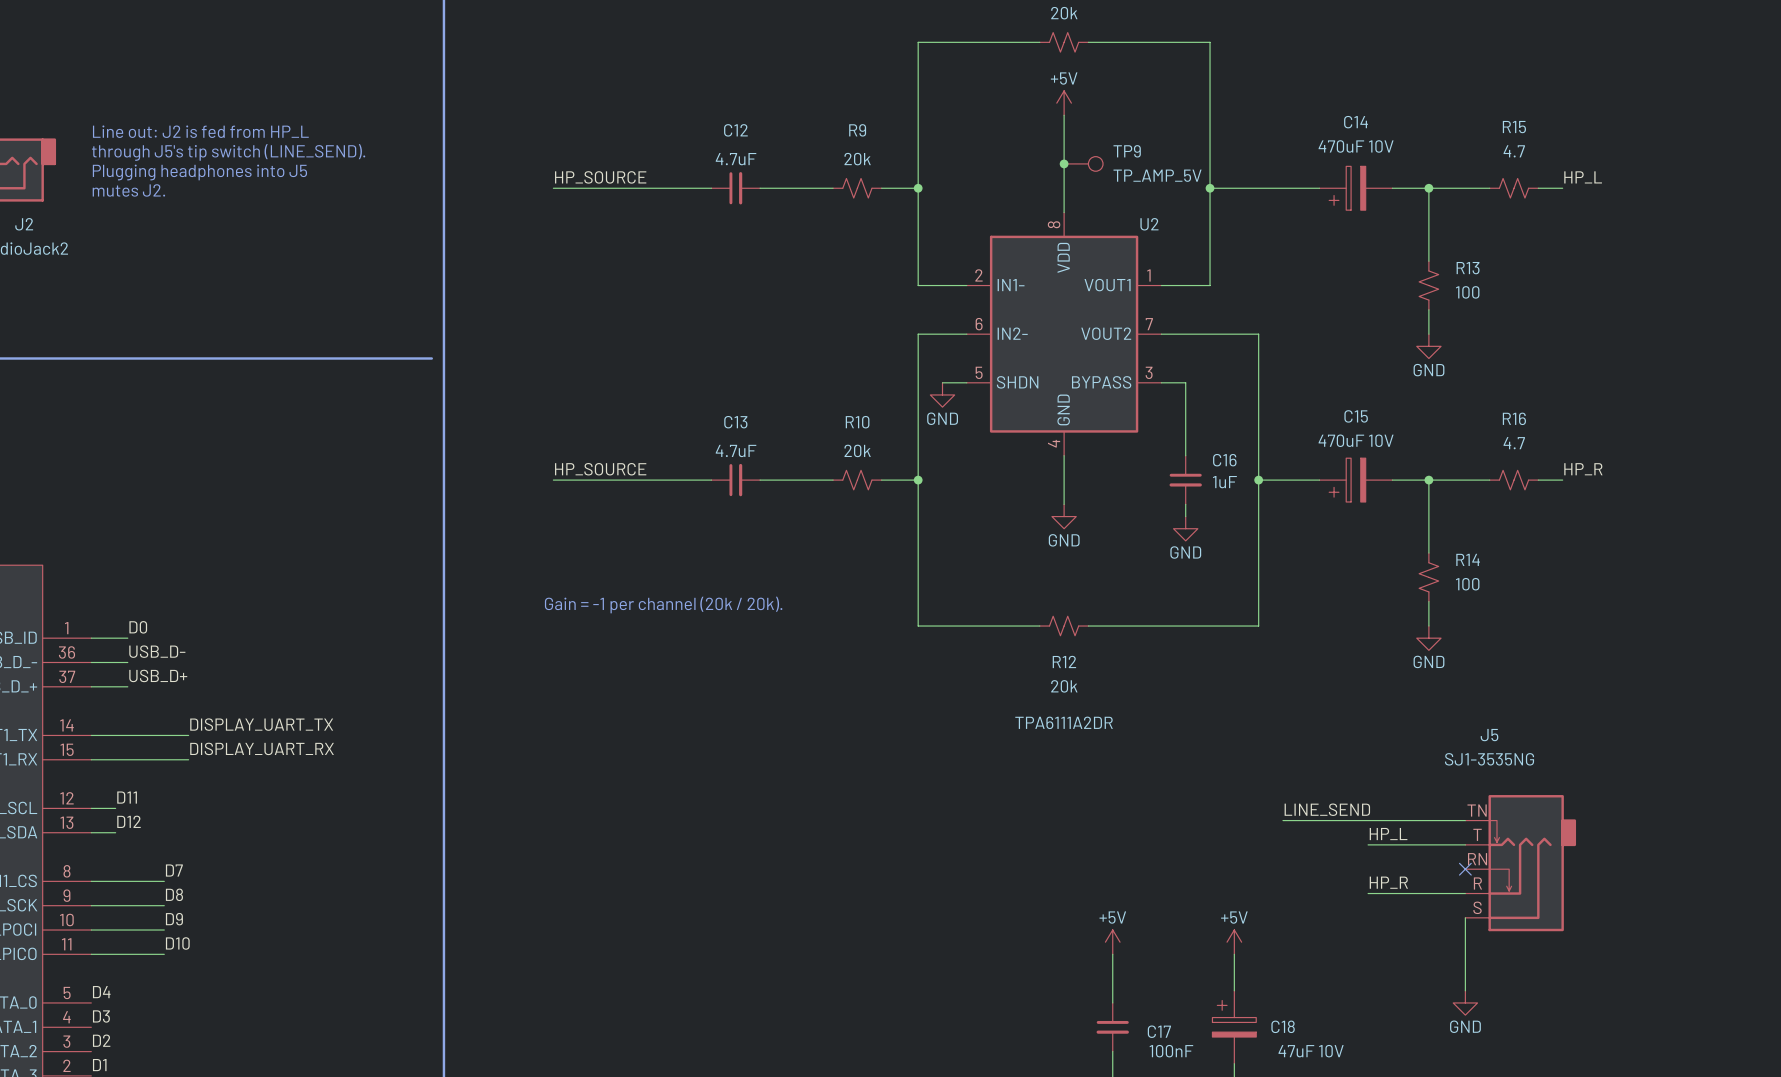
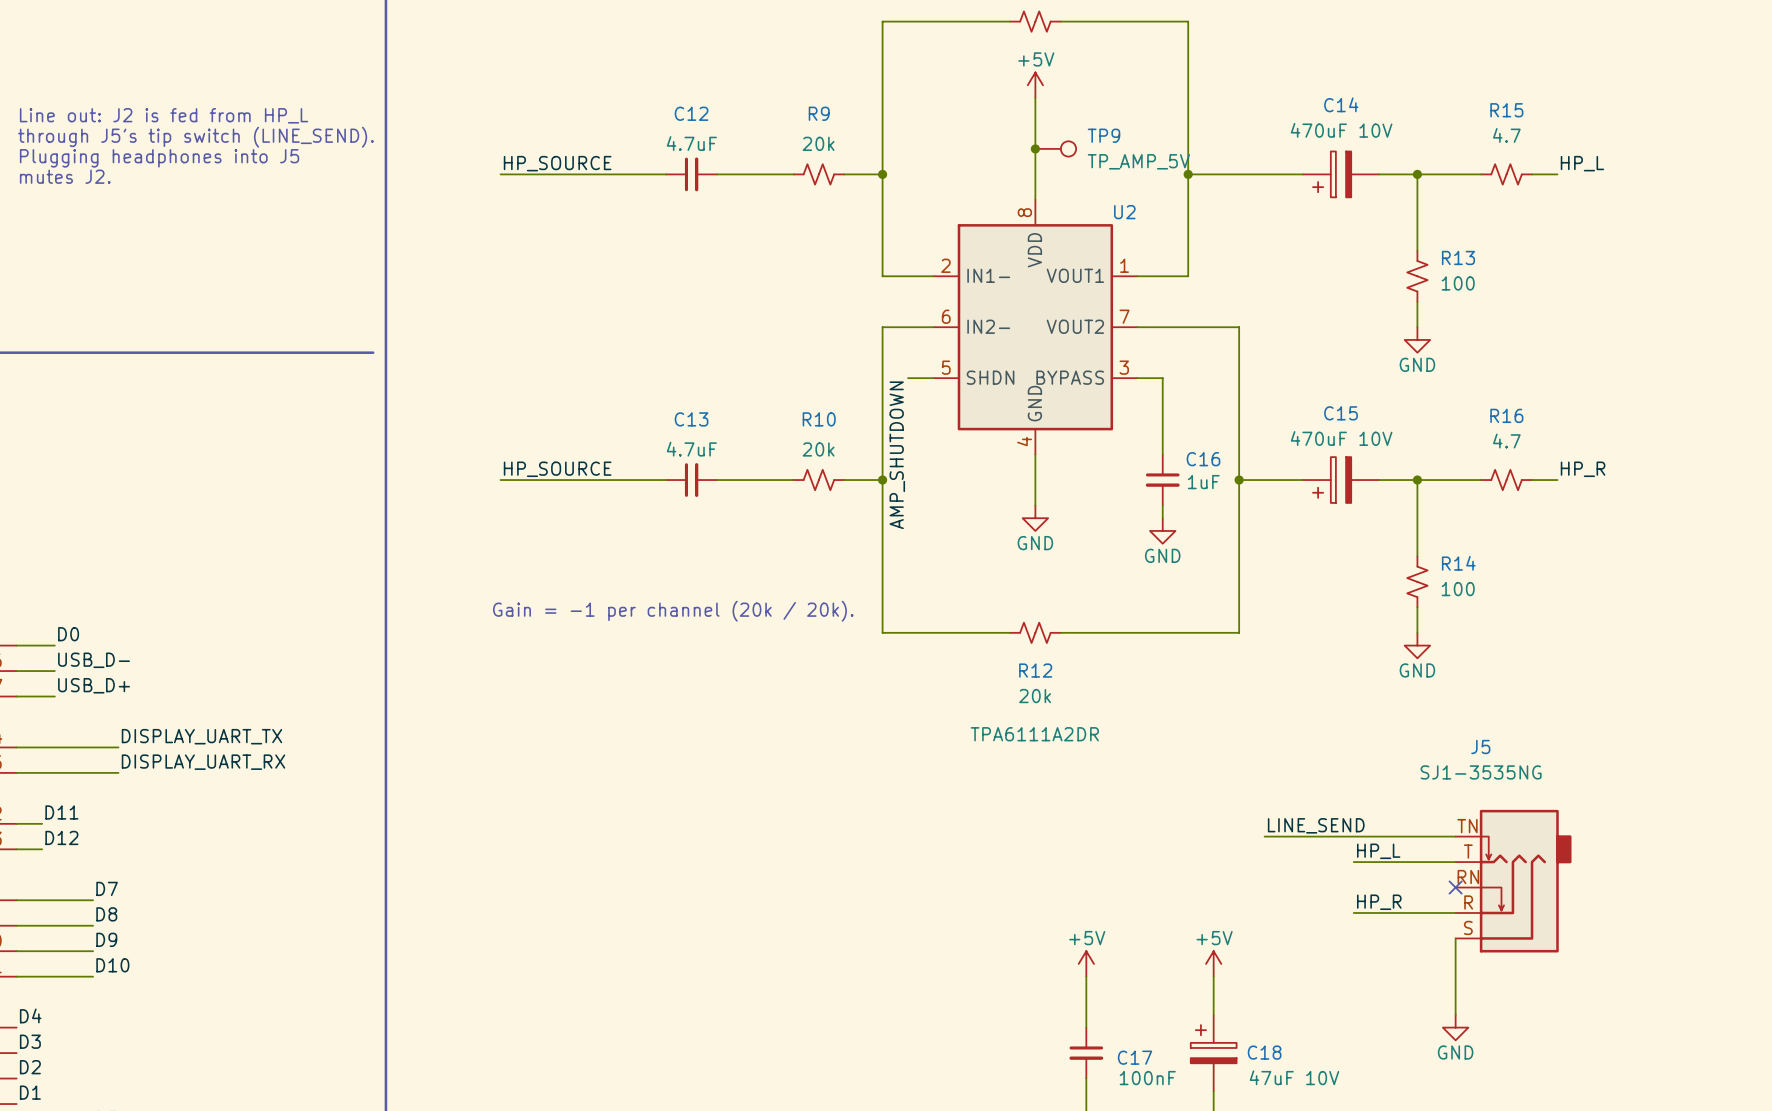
power symbol: GND (942, 394) -> none
label: none -> AMP_SHUTDOWN (897, 455)

